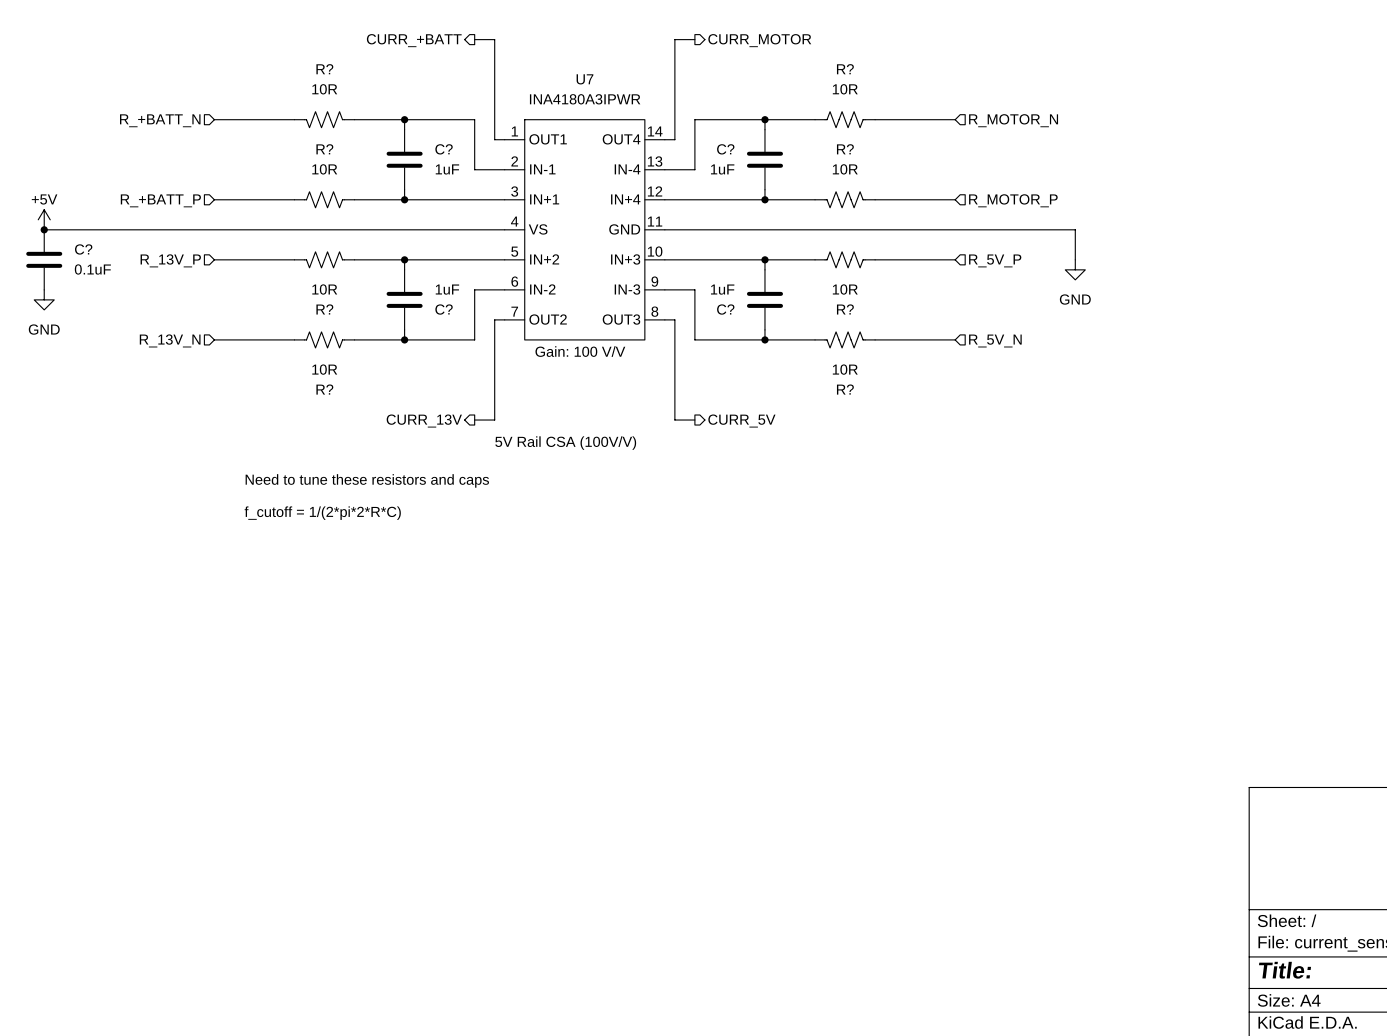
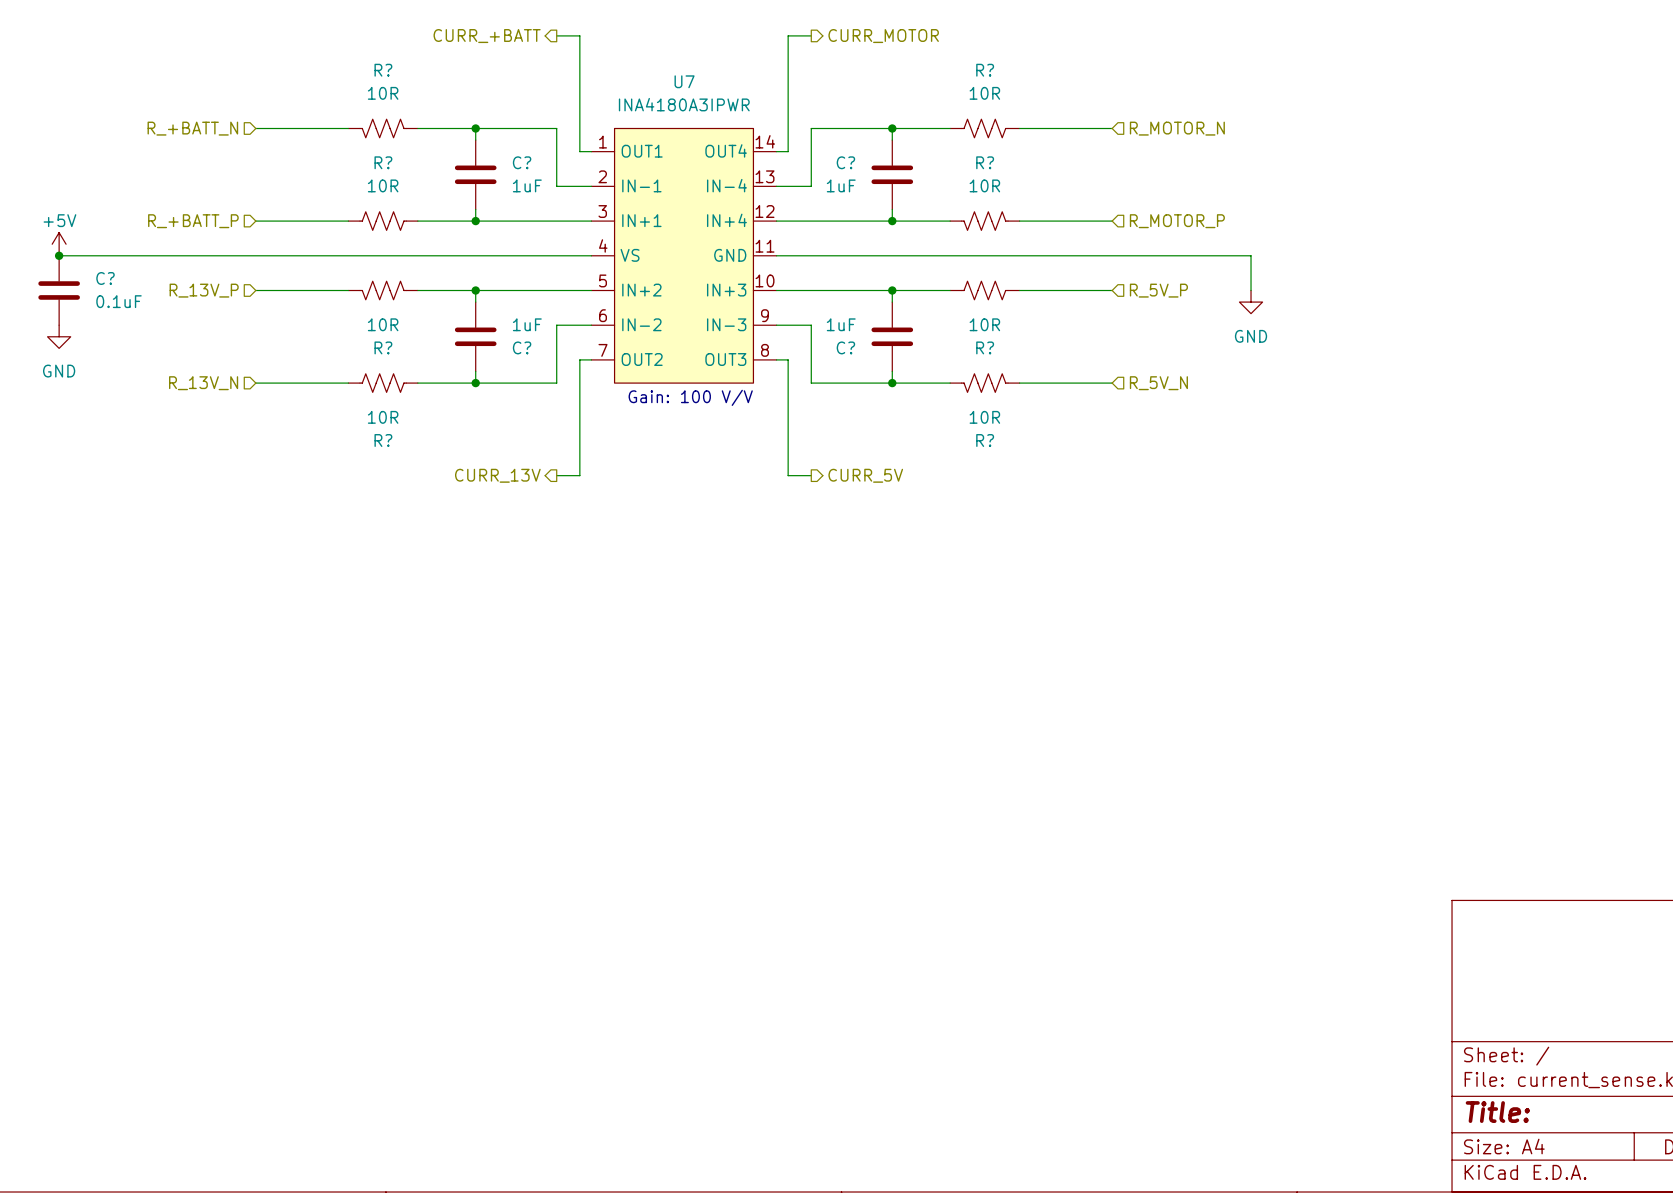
text: 5V Rail CSA (100V/V) (565, 443) -> none
text: Need to tune these resistors and caps (367, 480) -> none
text: f_cutoff = 1/(2*pi*2*R*C) (322, 513) -> none

